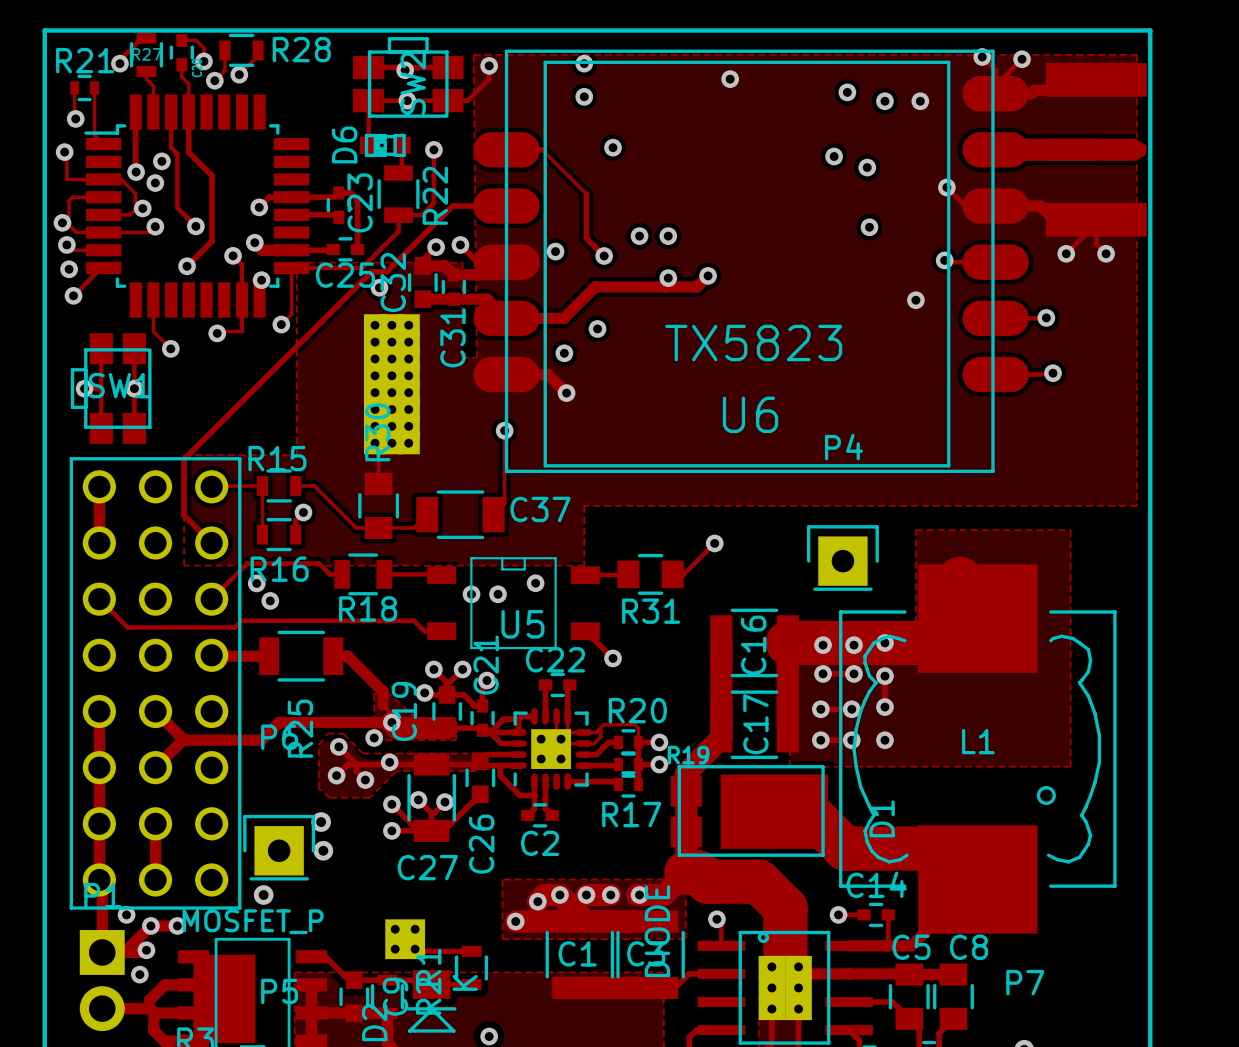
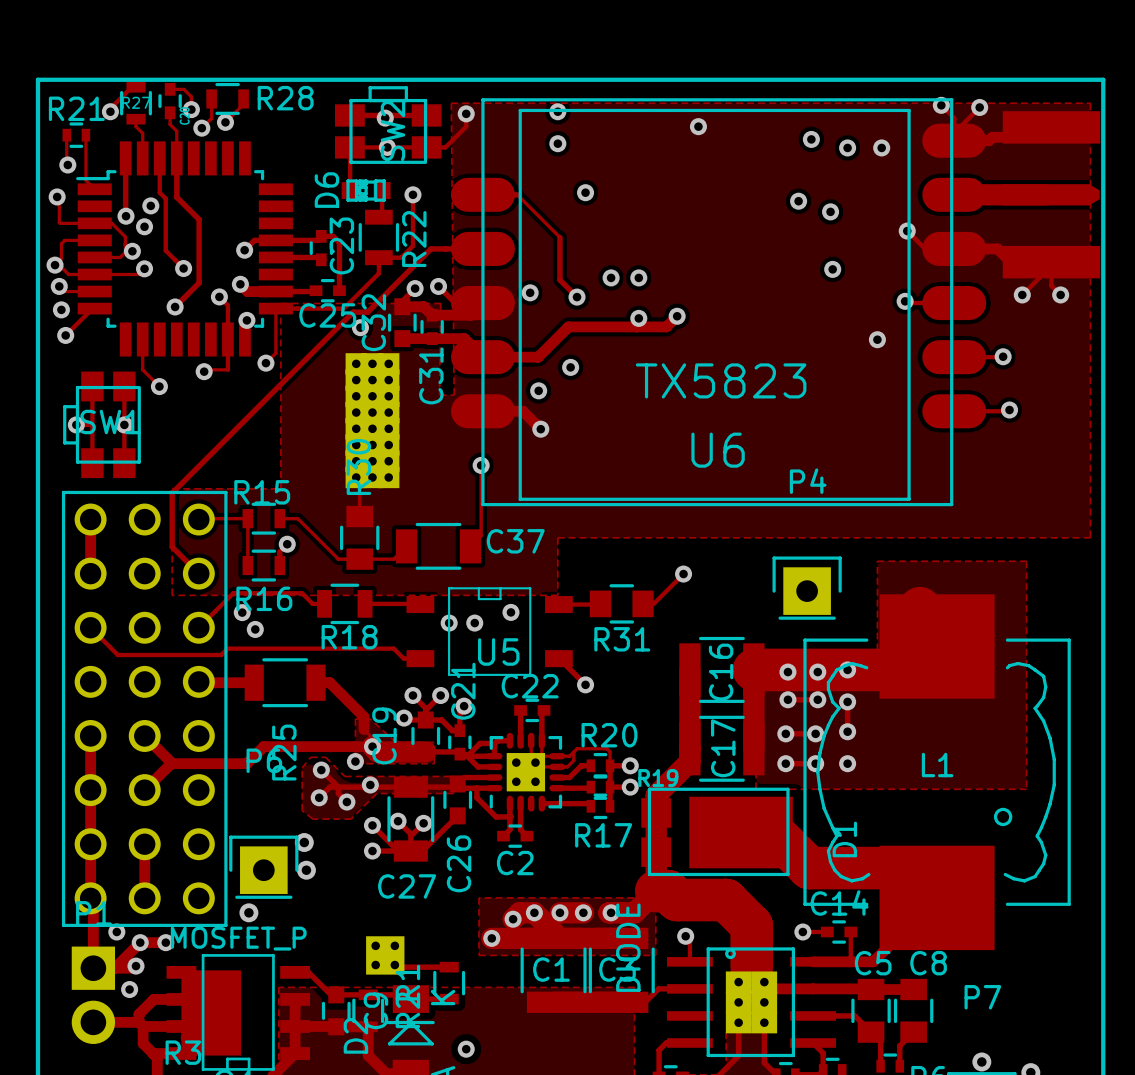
P5 name: P5 (279, 991) -> none

